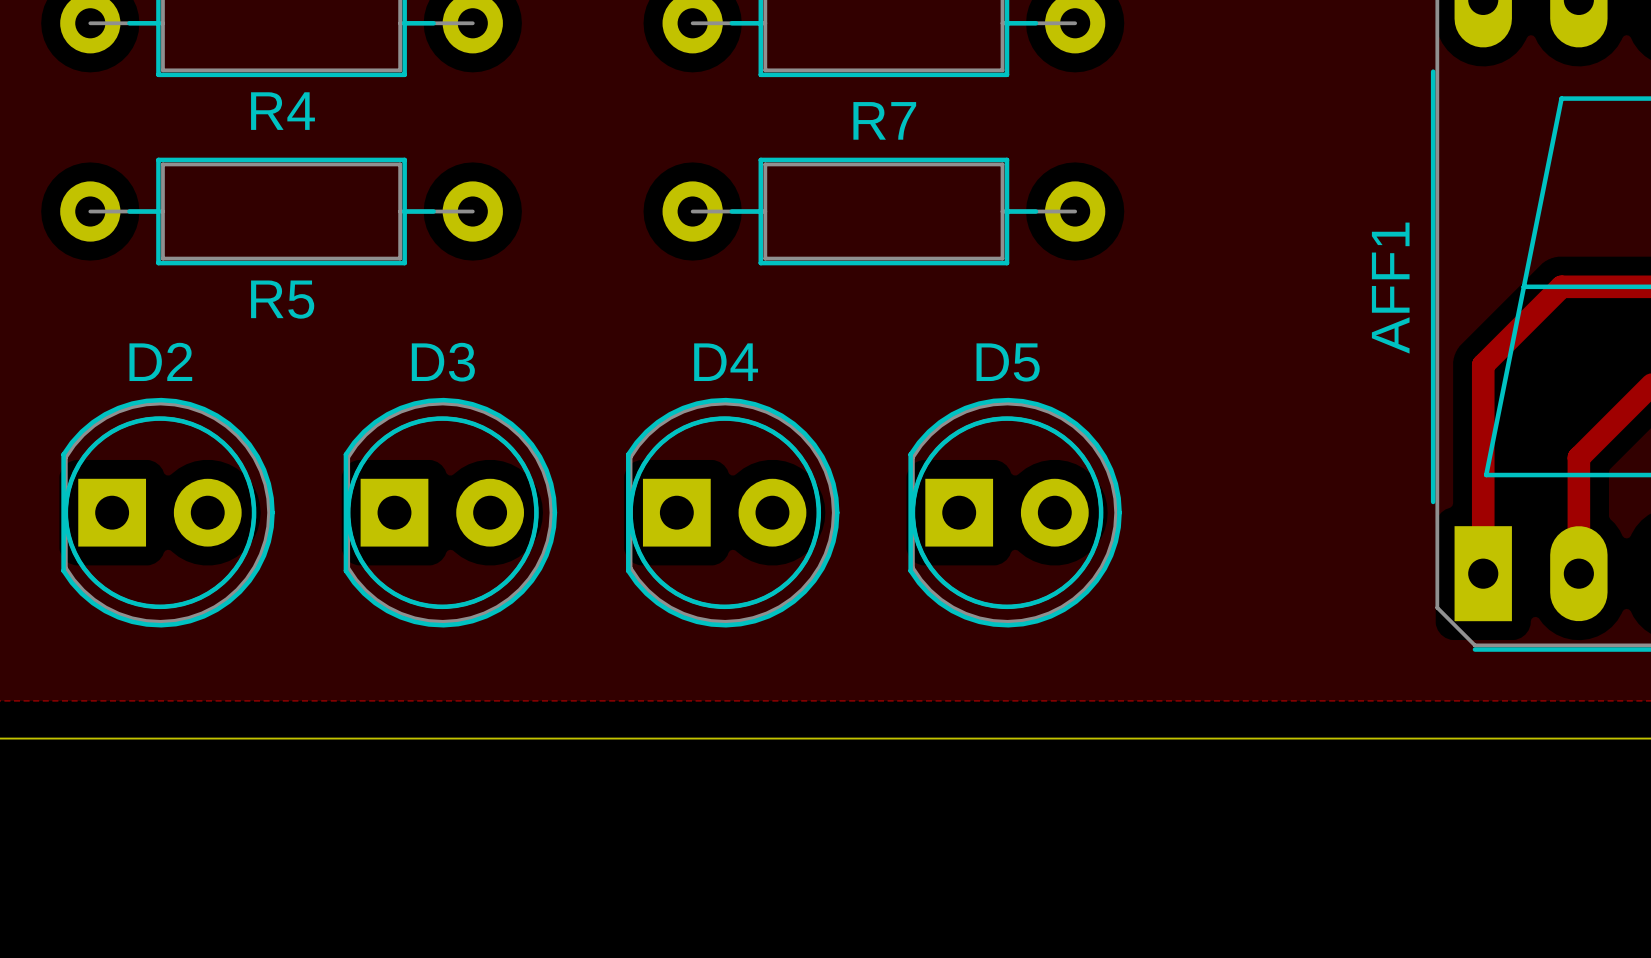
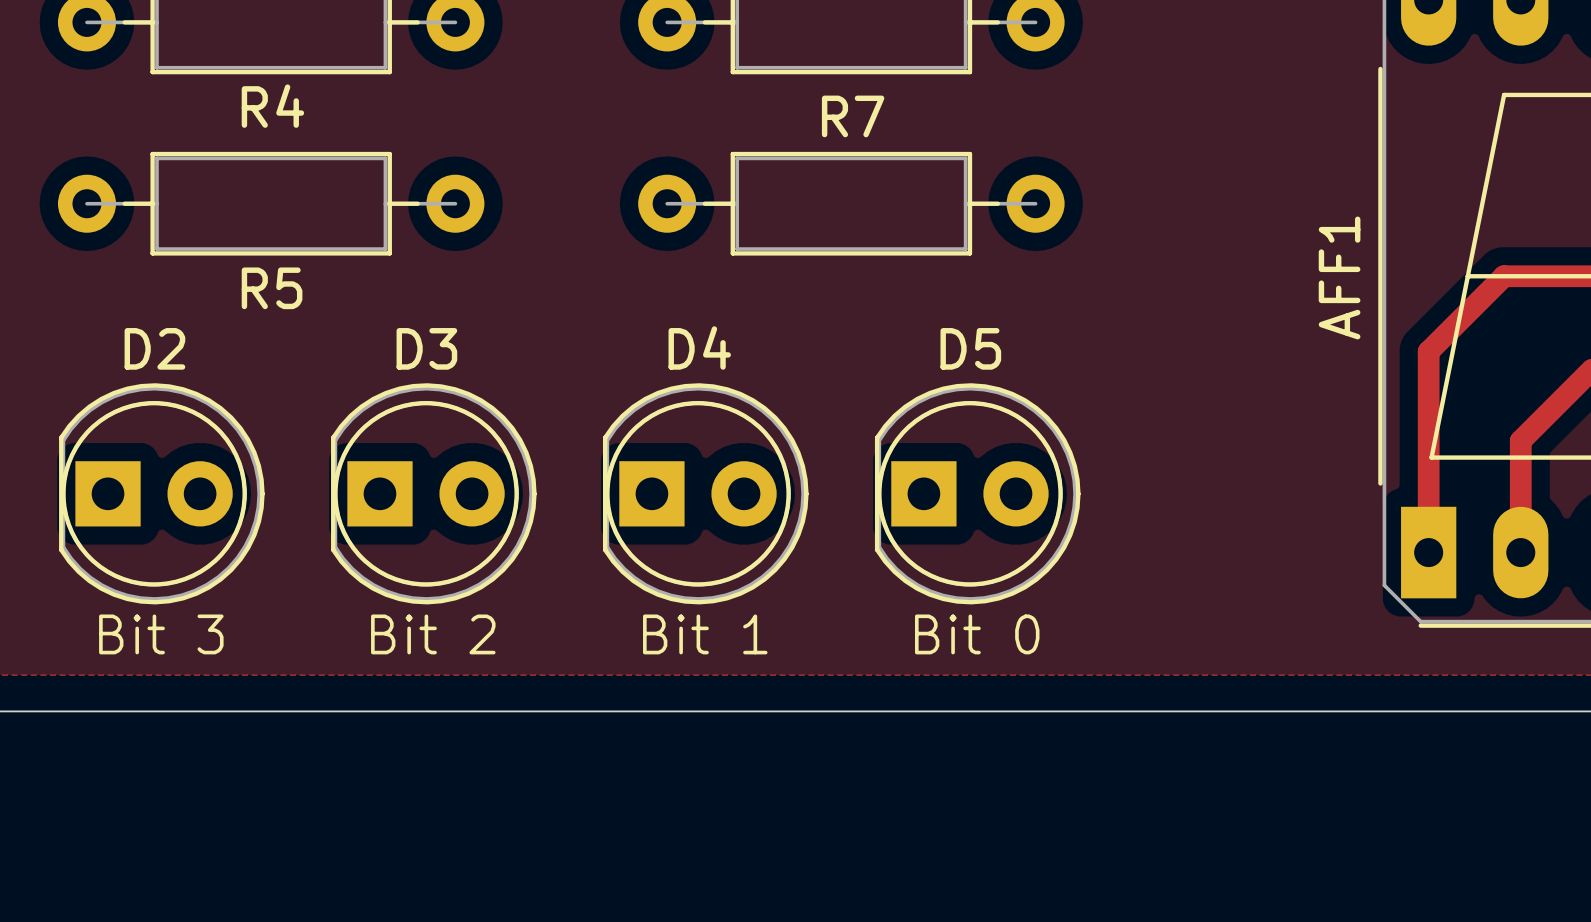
text: none -> Bit 3 (161, 634)
text: none -> Bit 2 (433, 634)
text: none -> Bit 1 (705, 634)
text: none -> Bit 0 (977, 634)

